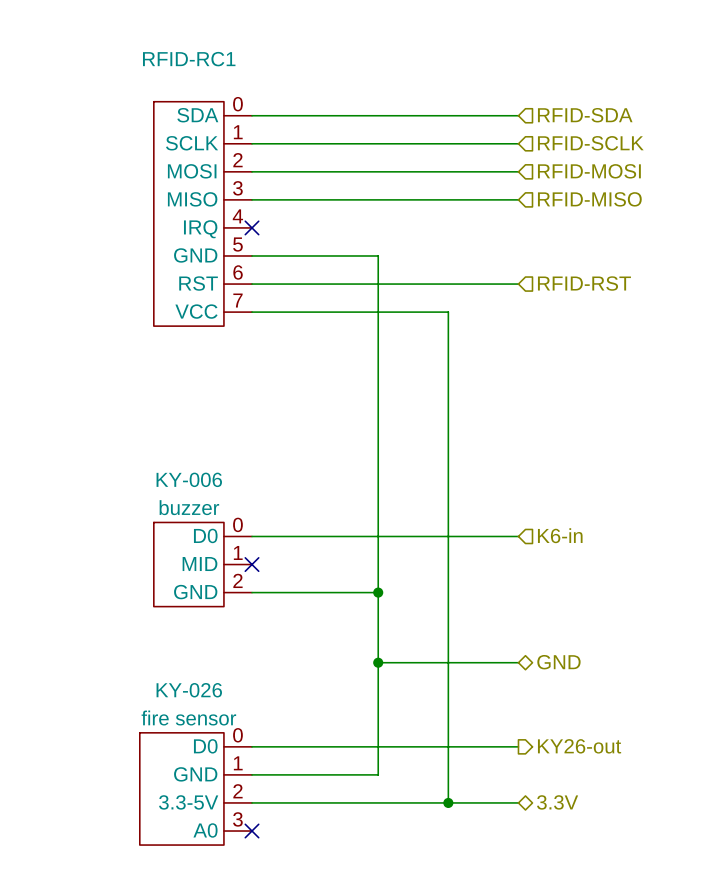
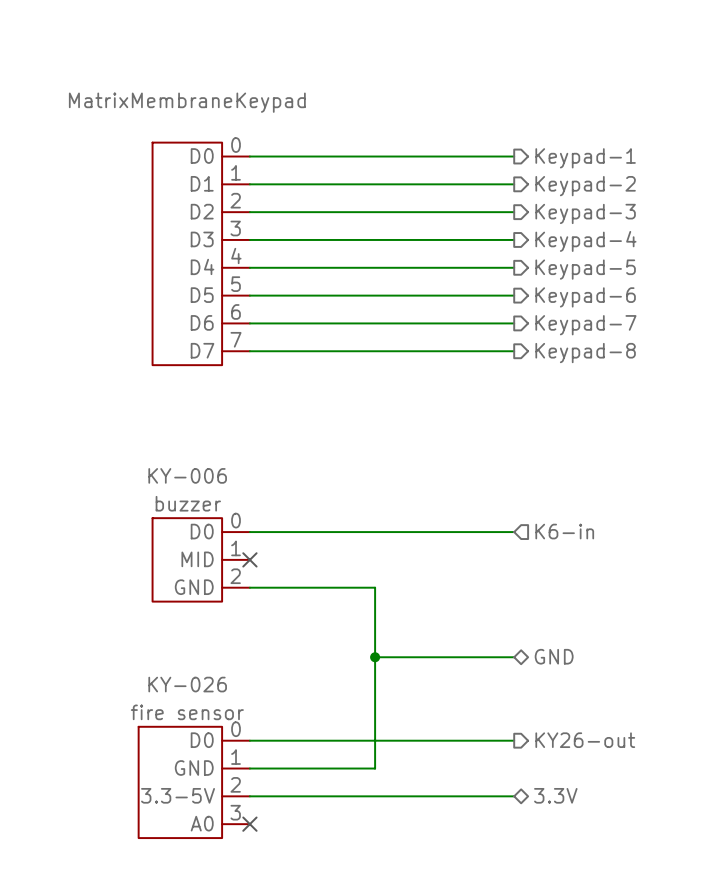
wire: (252, 115) (518, 115) -> (249, 156) (514, 156)
hierarchical label: RFID-SDA (585, 115) -> none
wire: (252, 143) (518, 143) -> (249, 184) (514, 184)
hierarchical label: RFID-SCLK (590, 143) -> none
hierarchical label: none -> Keypad-1 (585, 158)
wire: (252, 171) (518, 171) -> (249, 212) (514, 212)
hierarchical label: RFID-MOSI (589, 171) -> none
hierarchical label: none -> Keypad-2 (585, 186)
wire: (252, 199) (518, 199) -> (249, 239) (514, 239)
hierarchical label: RFID-MISO (589, 199) -> none
RFID-RC1: (202, 213) -> none
hierarchical label: none -> Keypad-3 (585, 213)
no-connect mark: (252, 227) -> none
hierarchical label: none -> Keypad-4 (585, 241)
MatrixMembraneKeypad: none -> (201, 253)
wire: (252, 255) (378, 255) (378, 592) -> none
wire: none -> (249, 267) (514, 267)
hierarchical label: none -> Keypad-5 (585, 269)
hierarchical label: RFID-RST (584, 283) -> none
wire: (252, 284) (518, 284) -> (249, 323) (514, 323)
wire: none -> (249, 295) (514, 295)
hierarchical label: none -> Keypad-6 (585, 297)
wire: (252, 312) (448, 312) (448, 802) -> none
hierarchical label: none -> Keypad-7 (585, 325)
wire: none -> (249, 351) (514, 351)
hierarchical label: none -> Keypad-8 (585, 353)
junction: (378, 592) -> none
junction: (448, 802) -> none

